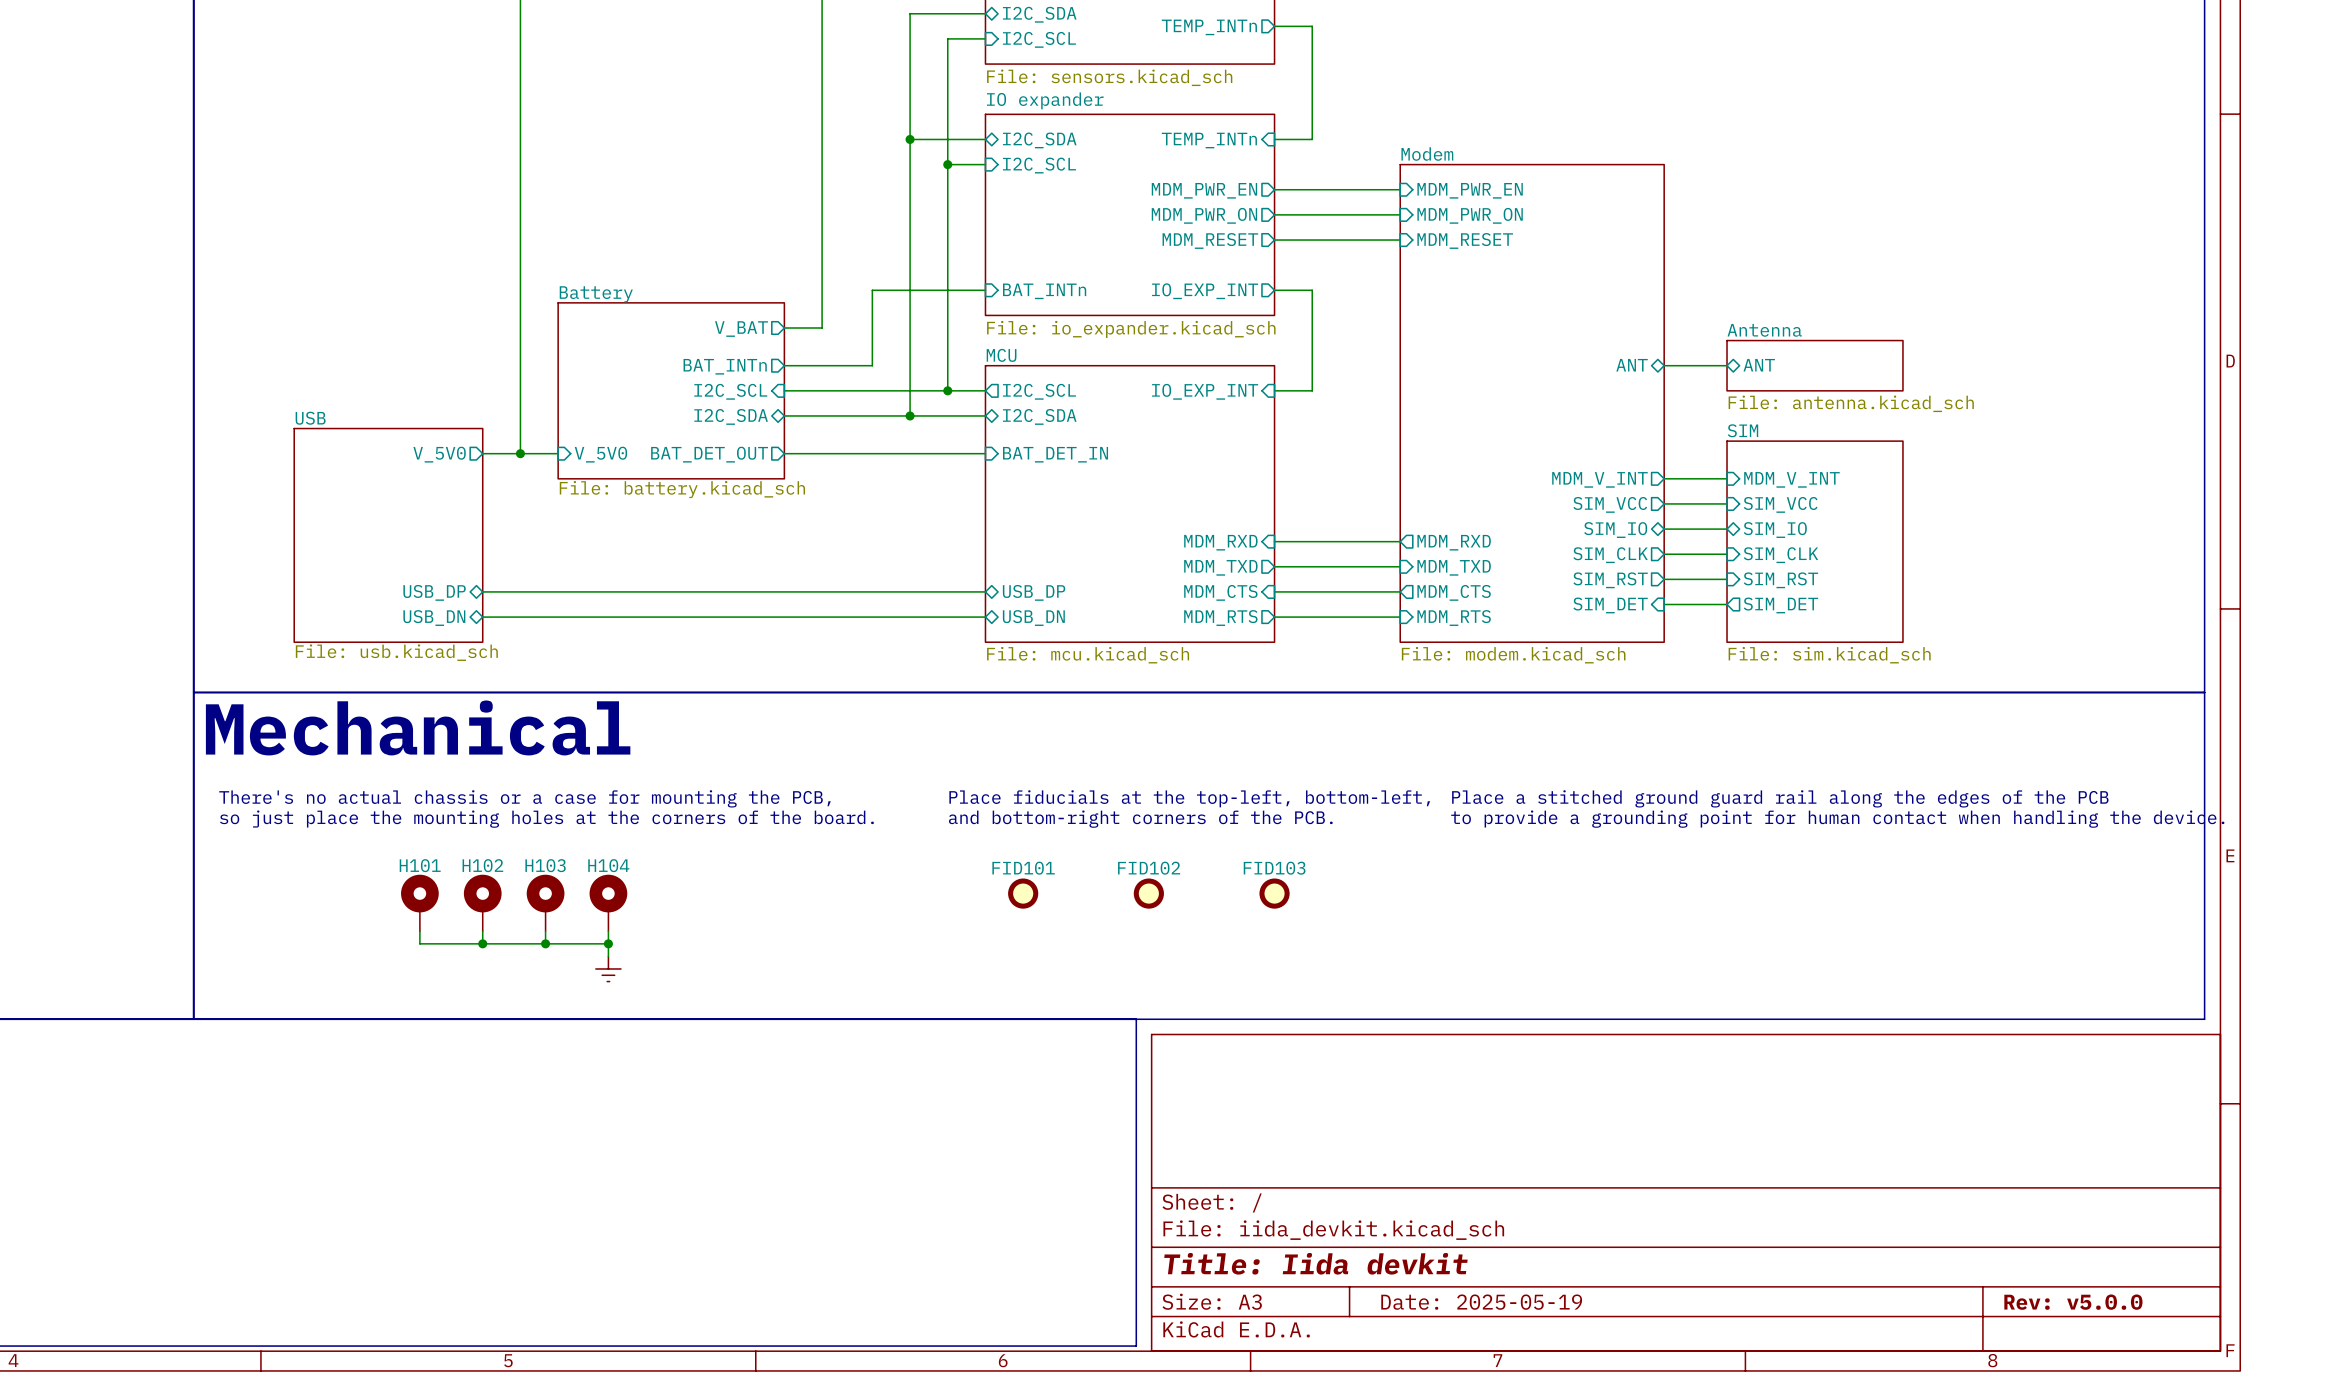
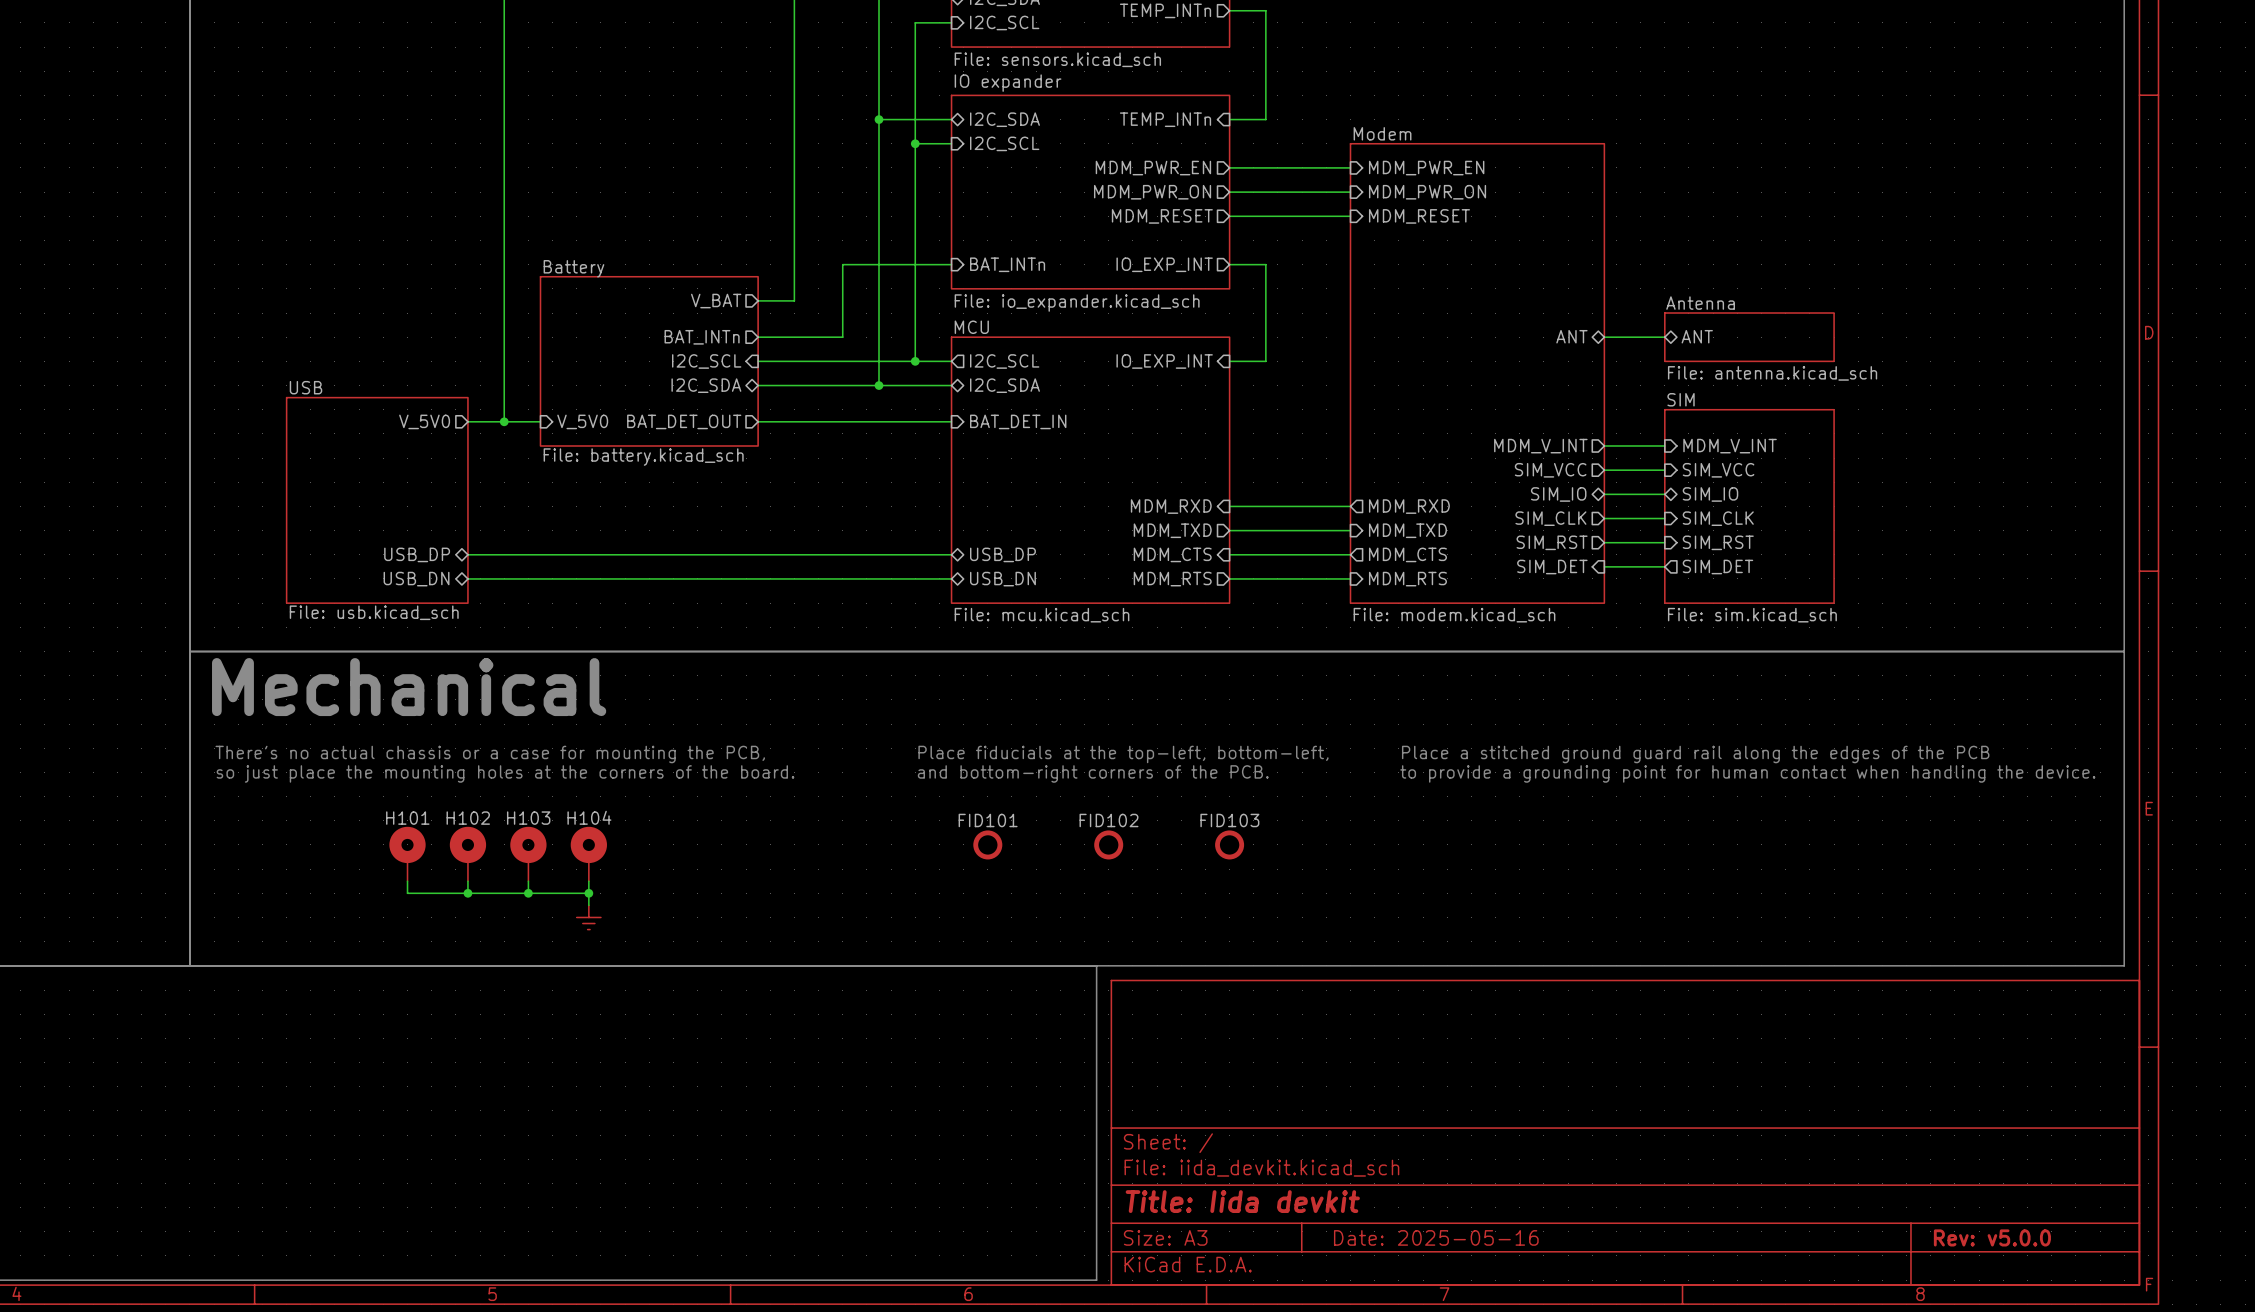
title block: Date: 2025-05-19 (1481, 1302) -> Date: 2025-05-16 (1436, 1237)

